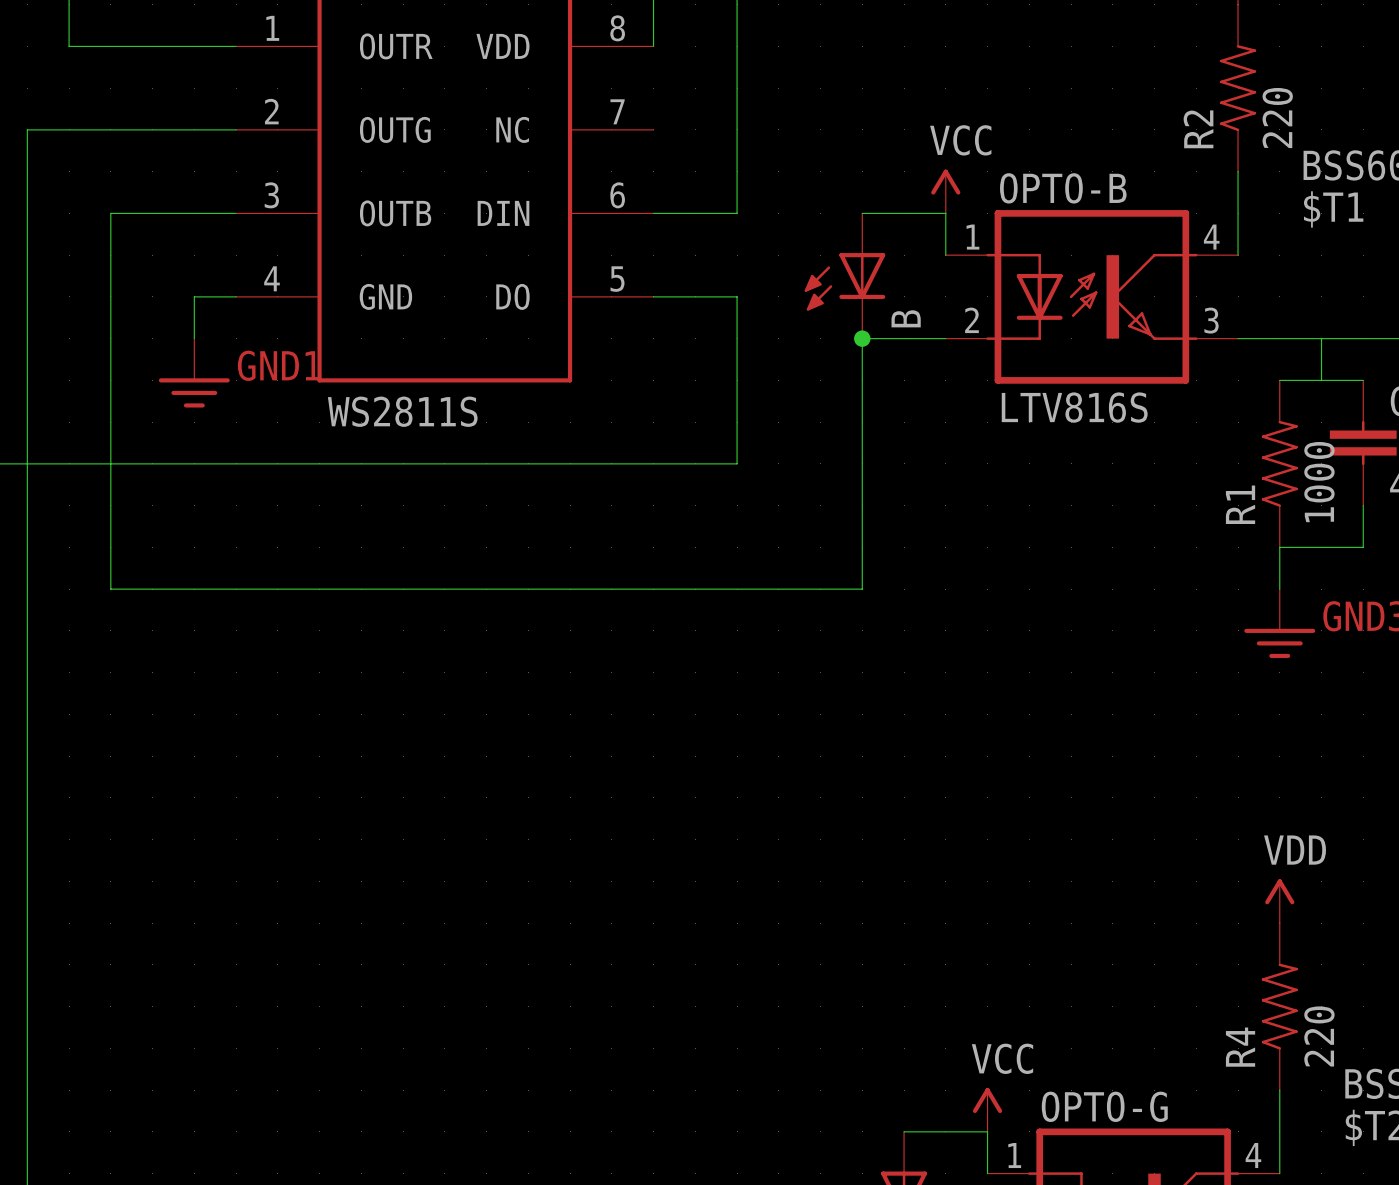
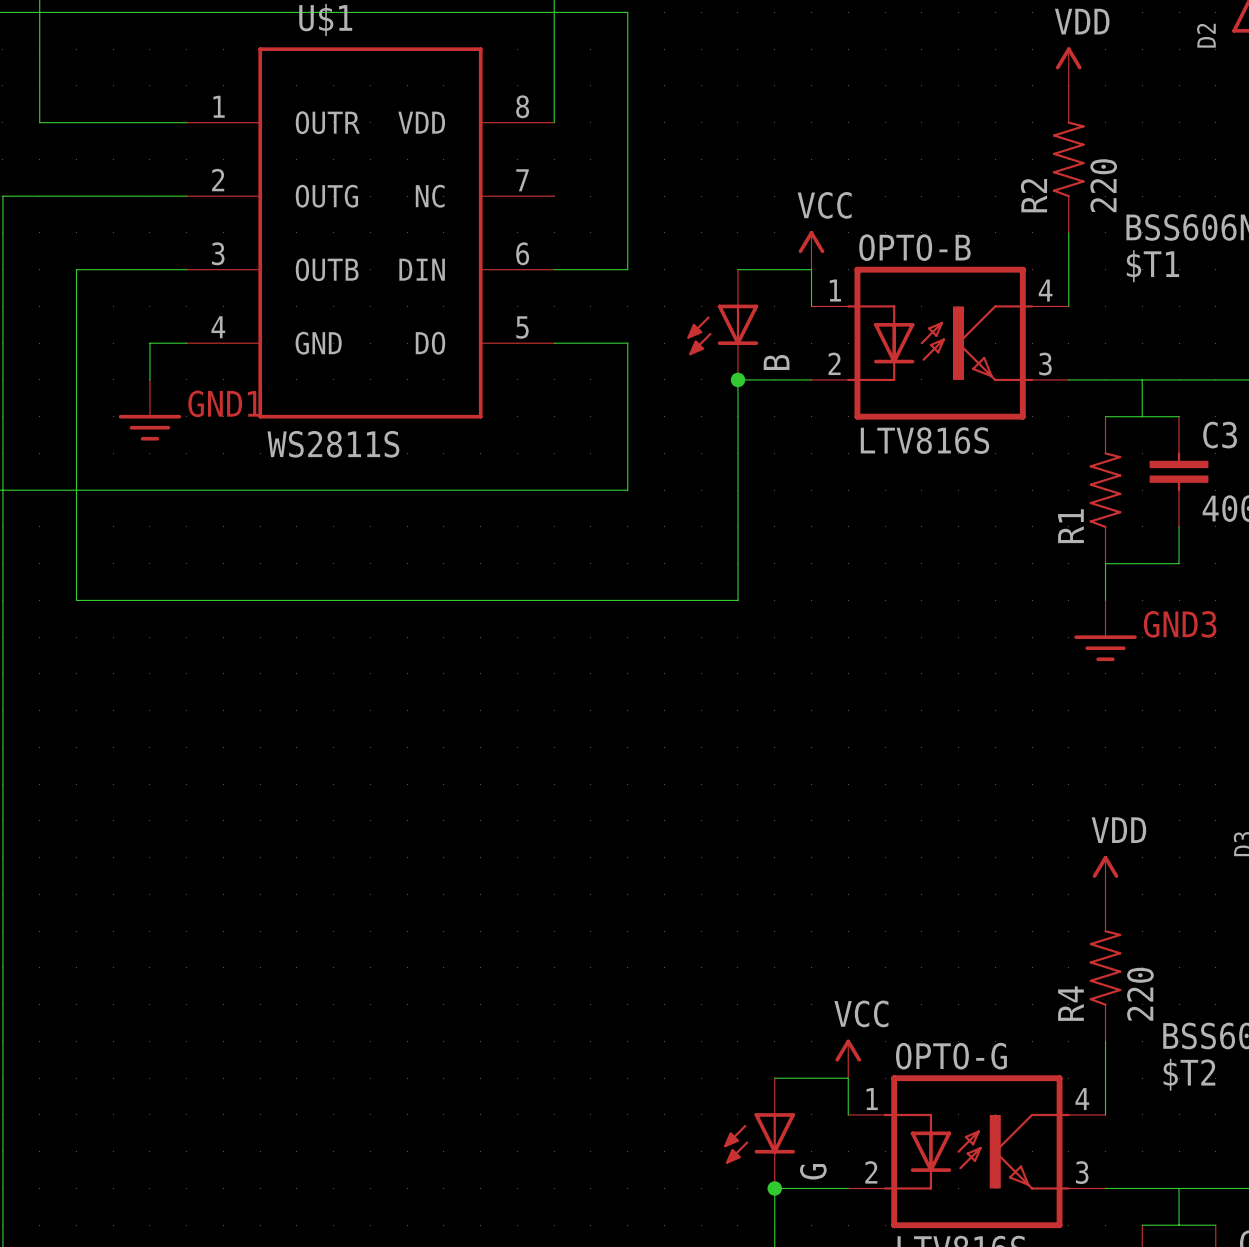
R1 value: 1000 (1319, 482) -> none

